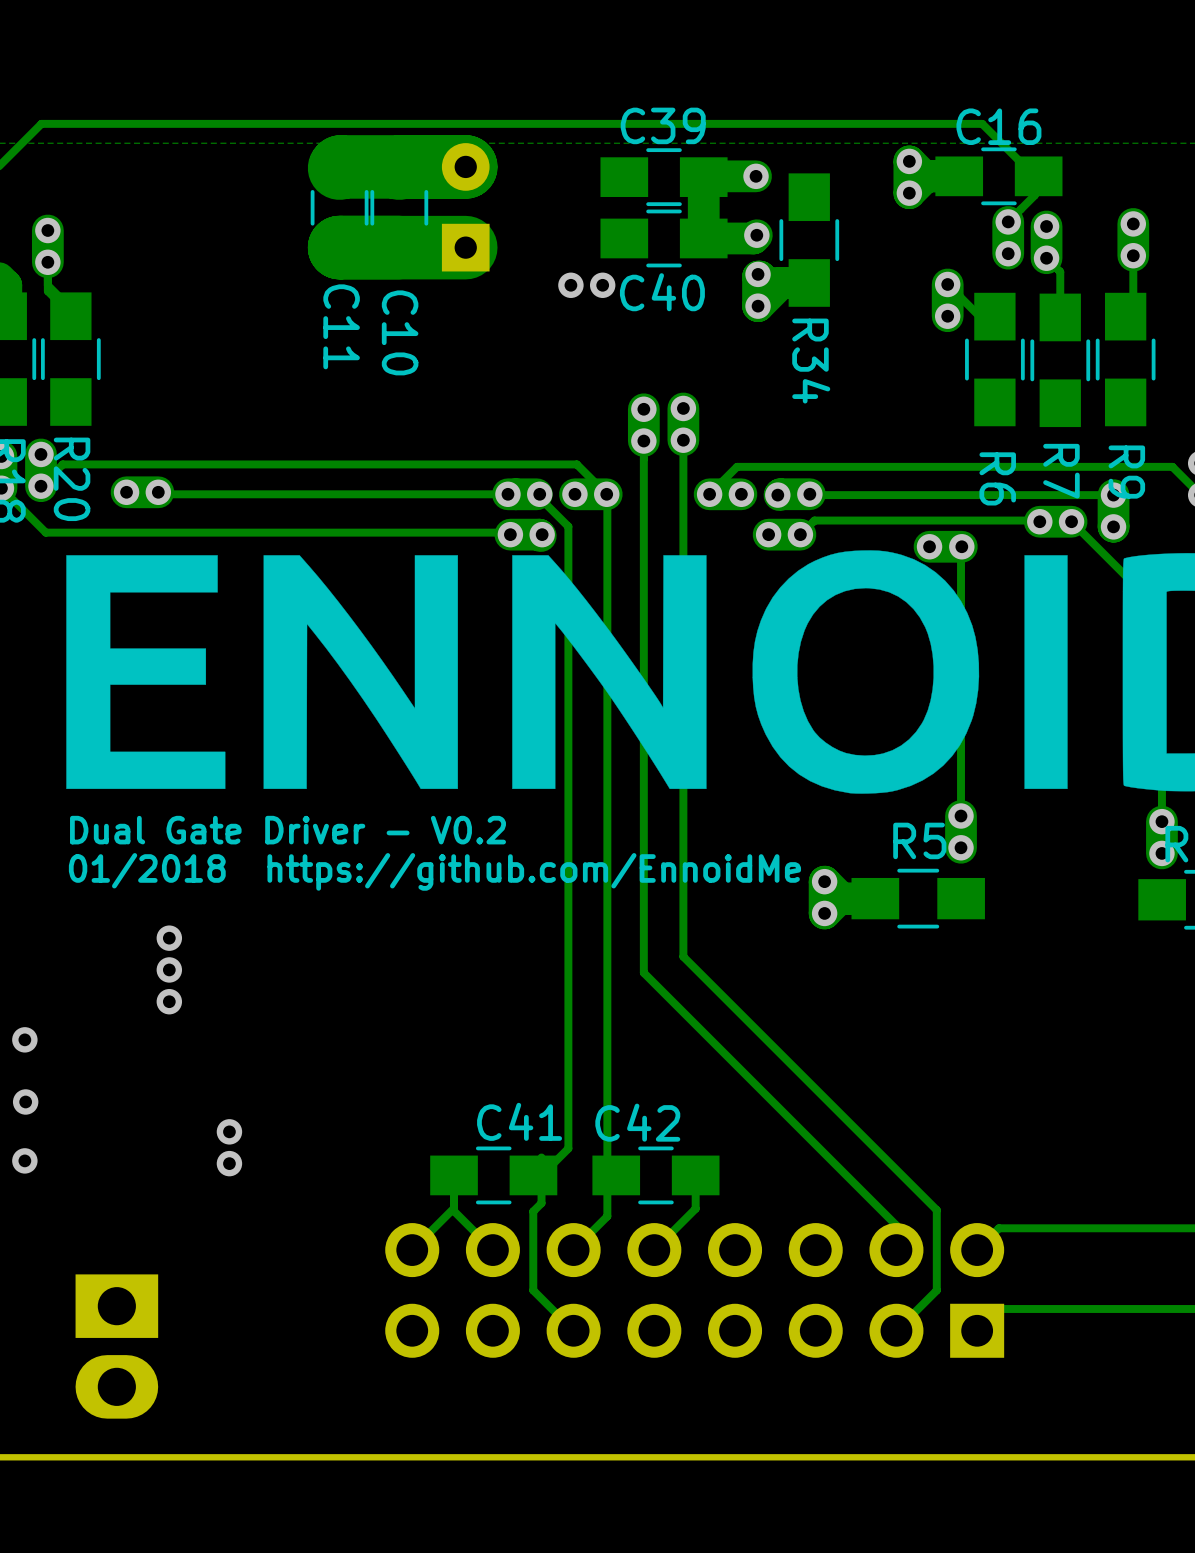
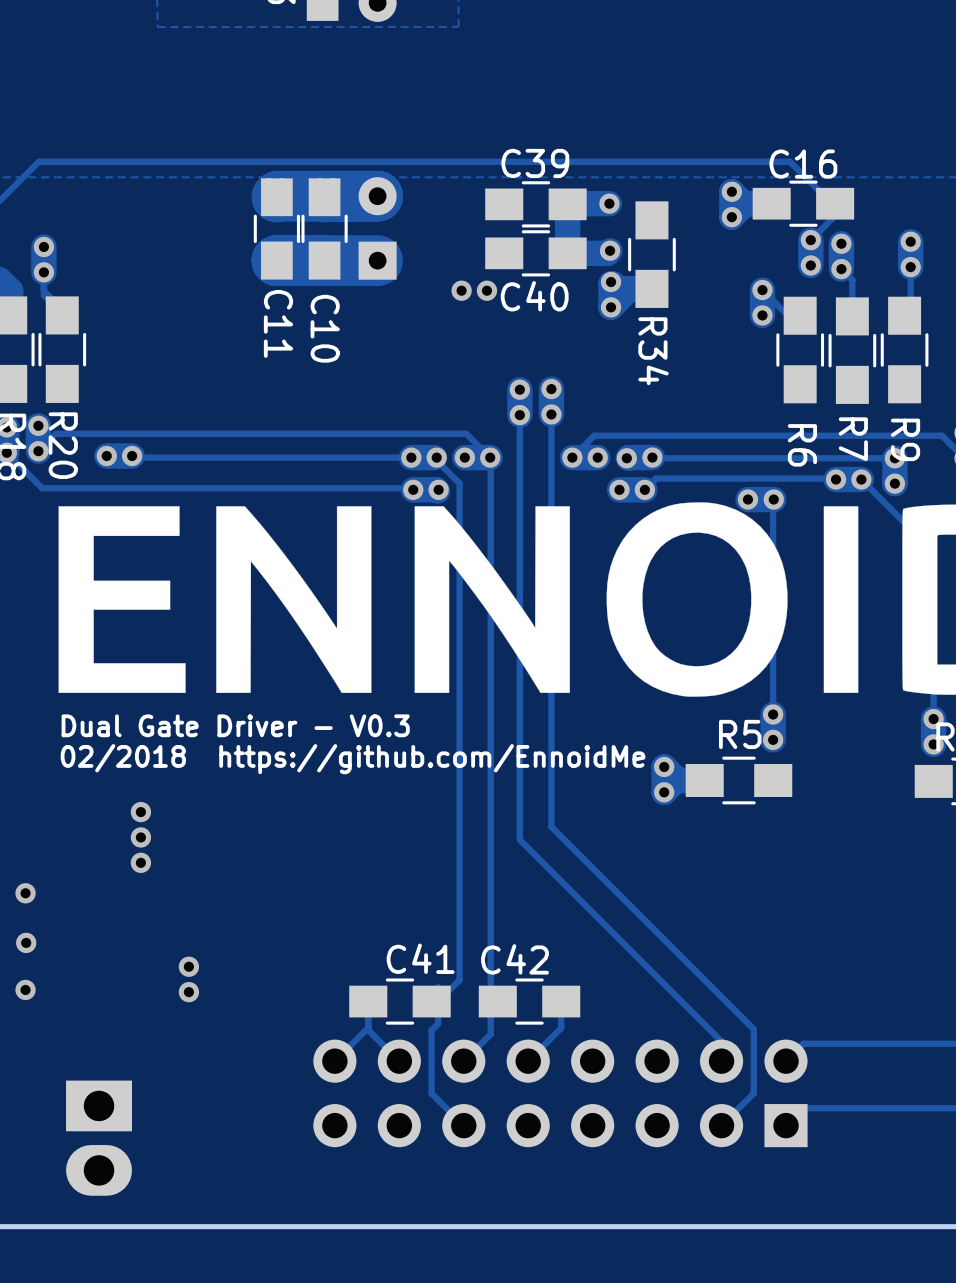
text: Dual Gate Driver - V0.2 (288, 830) -> Dual Gate Driver - V0.3 (235, 725)
text: 01/2018 https://github.com/EnnoidMe (434, 871) -> 02/2018 https://github.com/EnnoidMe (353, 759)

